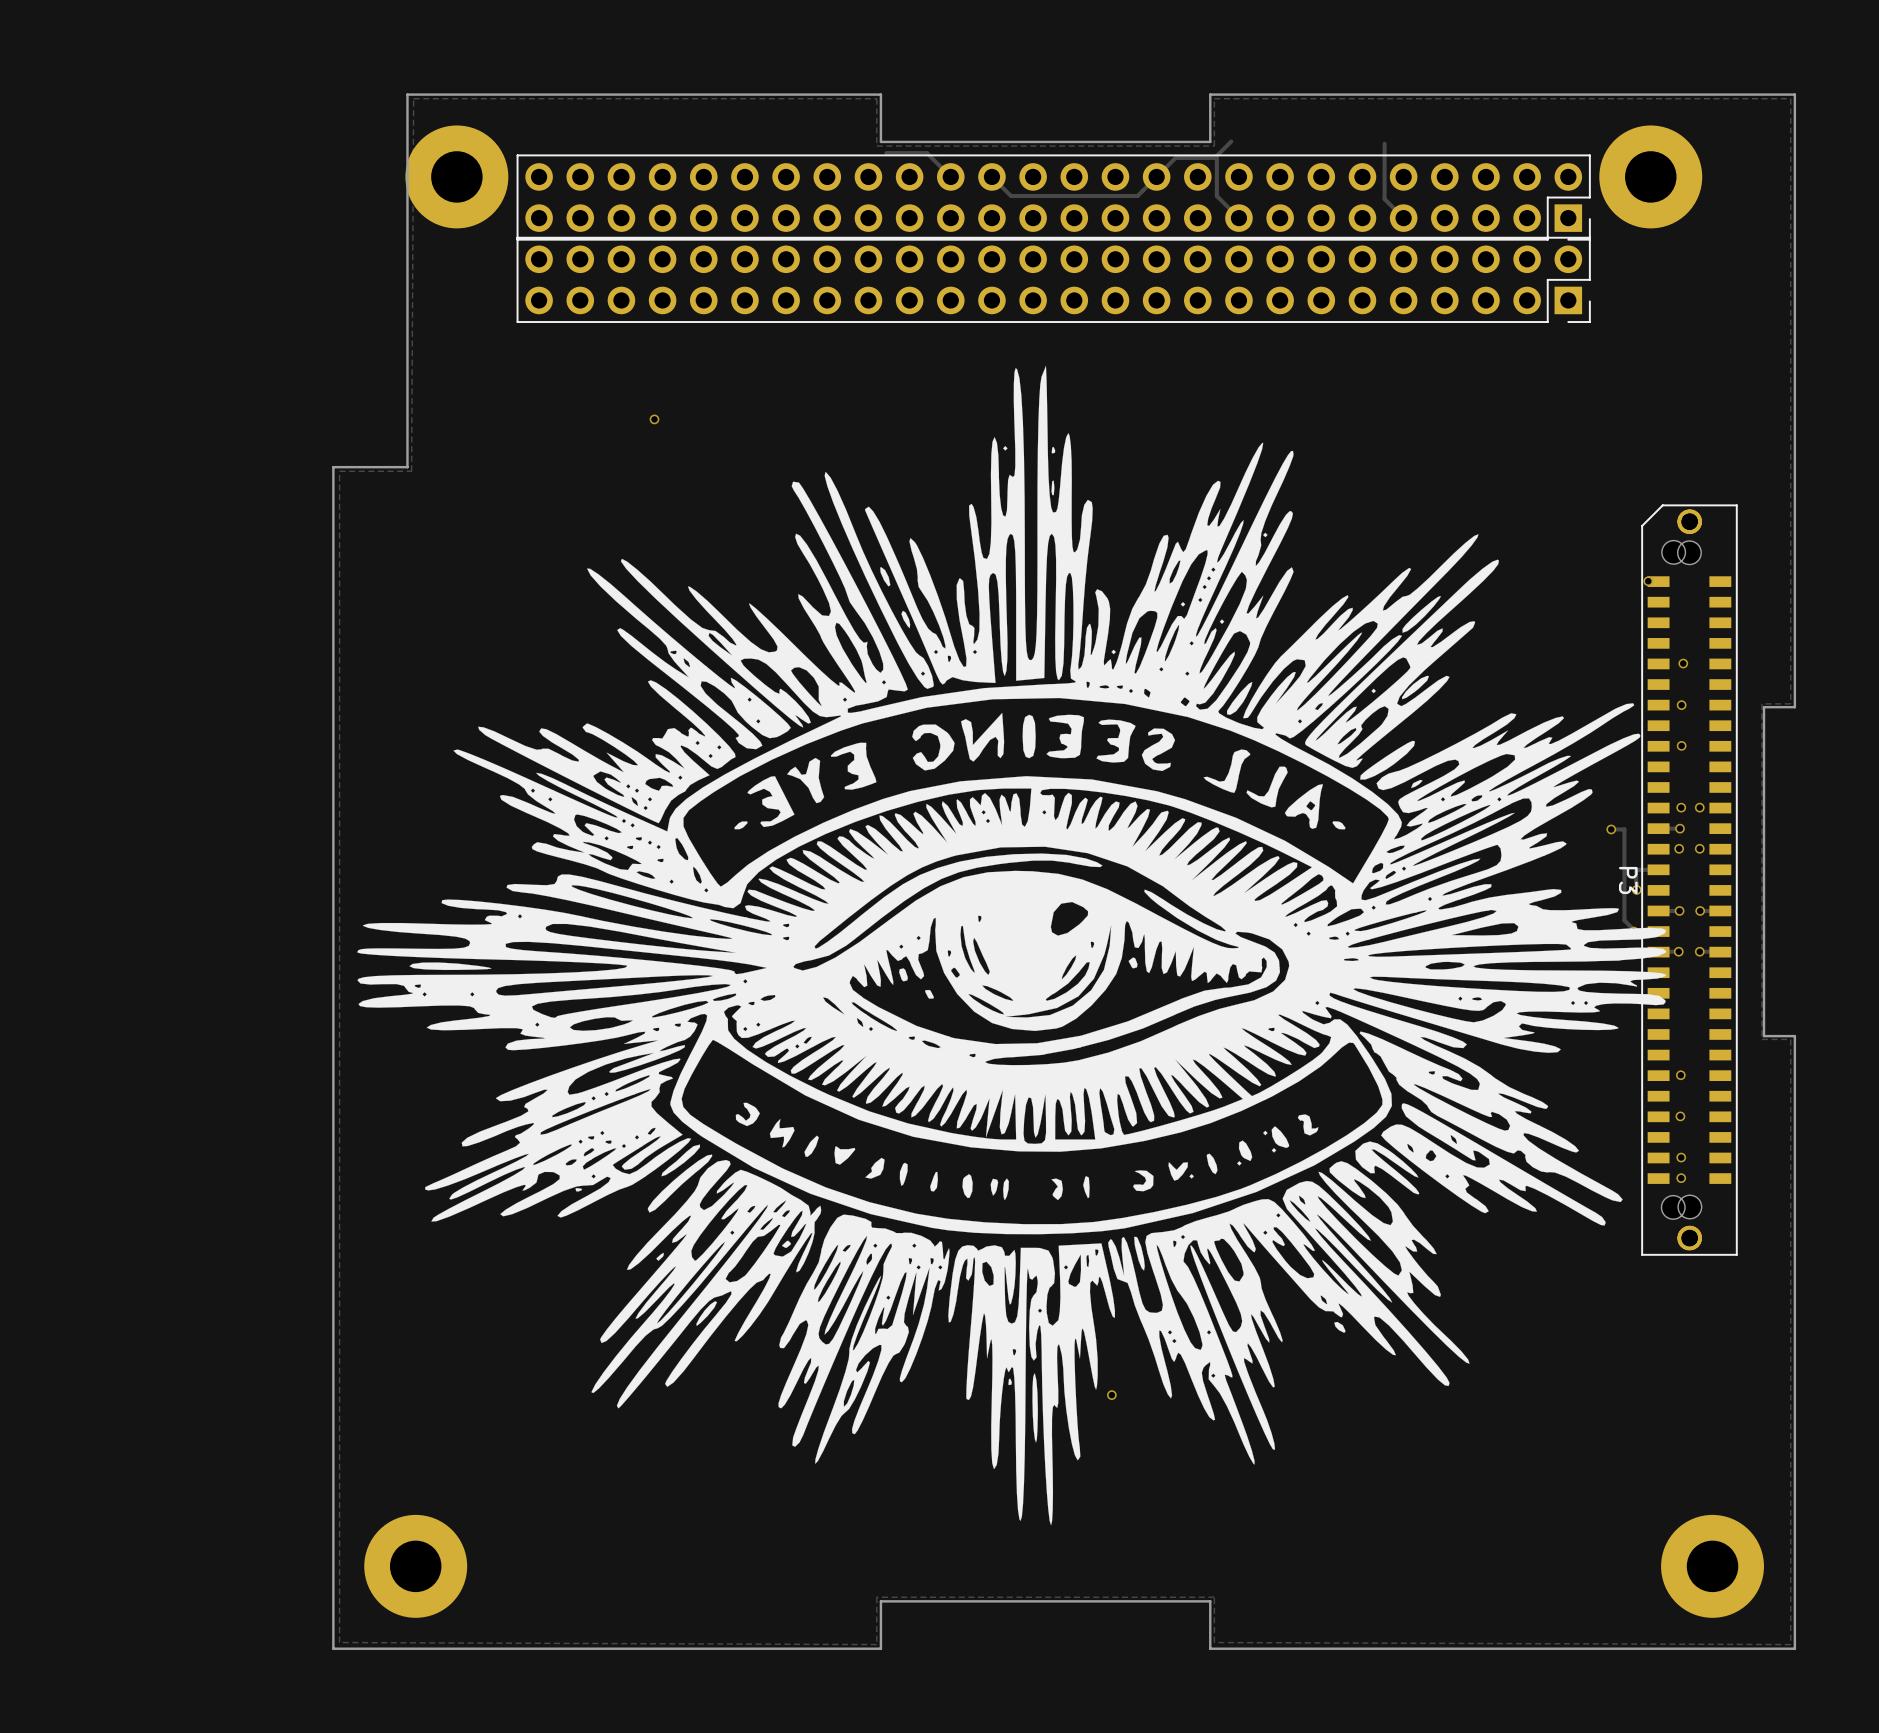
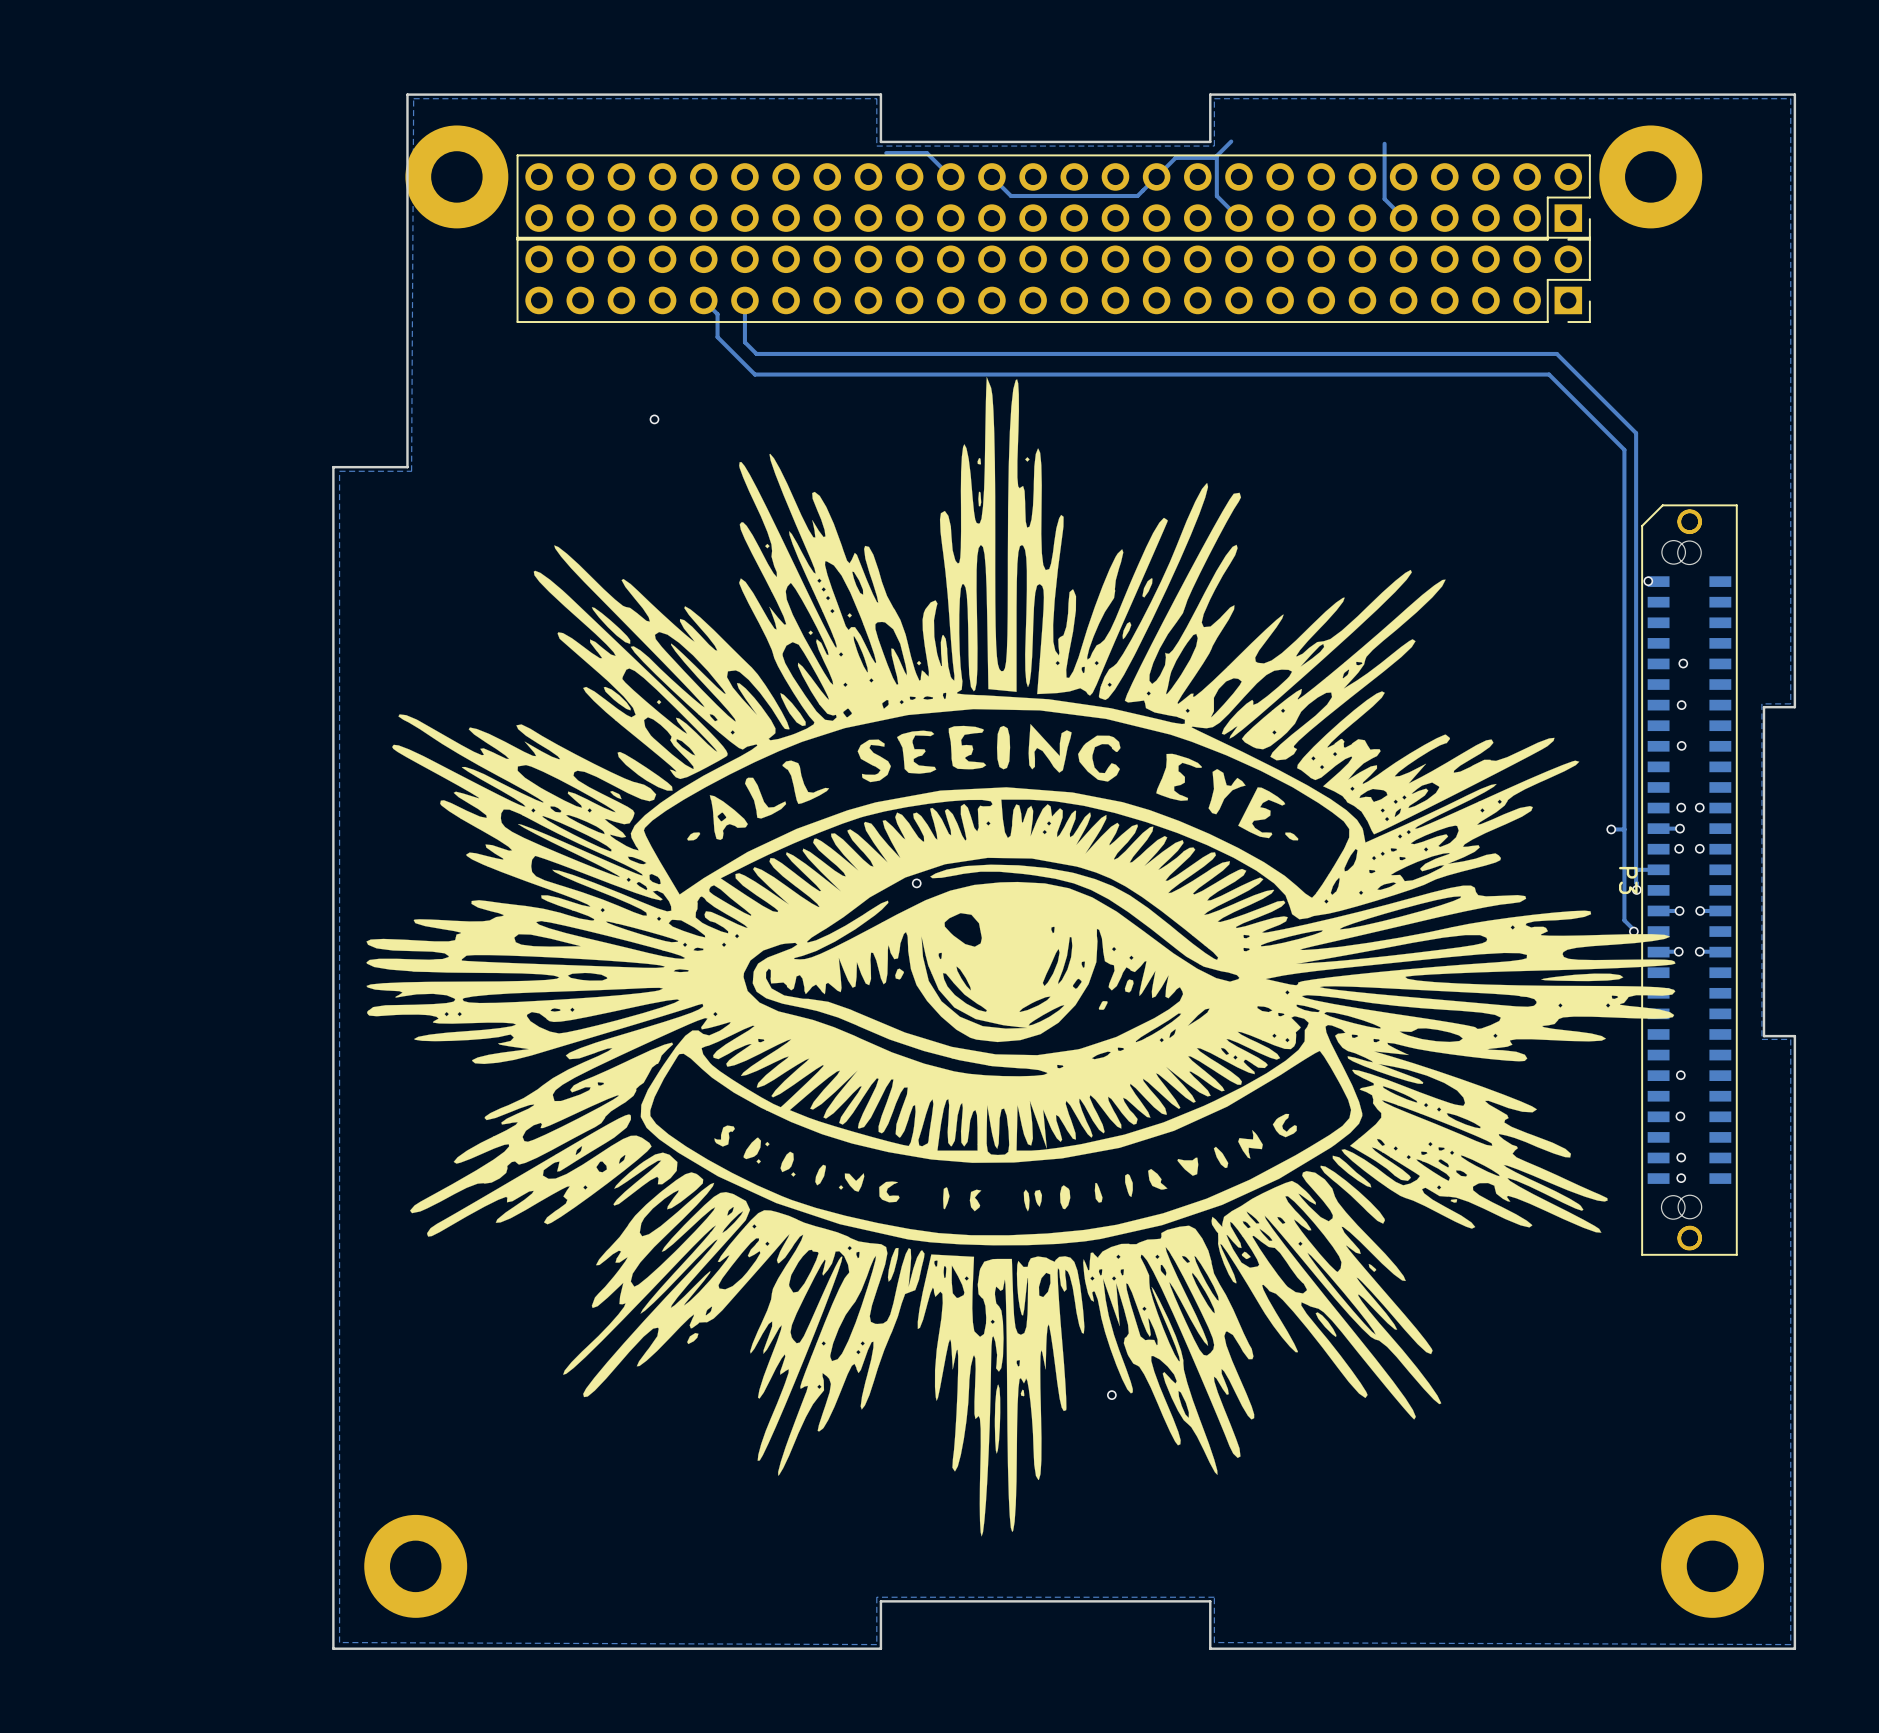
track: none -> (703, 300) (717, 314) (717, 337) (754, 374) (1549, 374) (1624, 449) (1624, 829)
track: none -> (744, 300) (744, 342) (756, 353) (1556, 353) (1636, 433) (1636, 871)
drawing shape: [357, 365, 1667, 1526] -> [366, 377, 1676, 1537]

